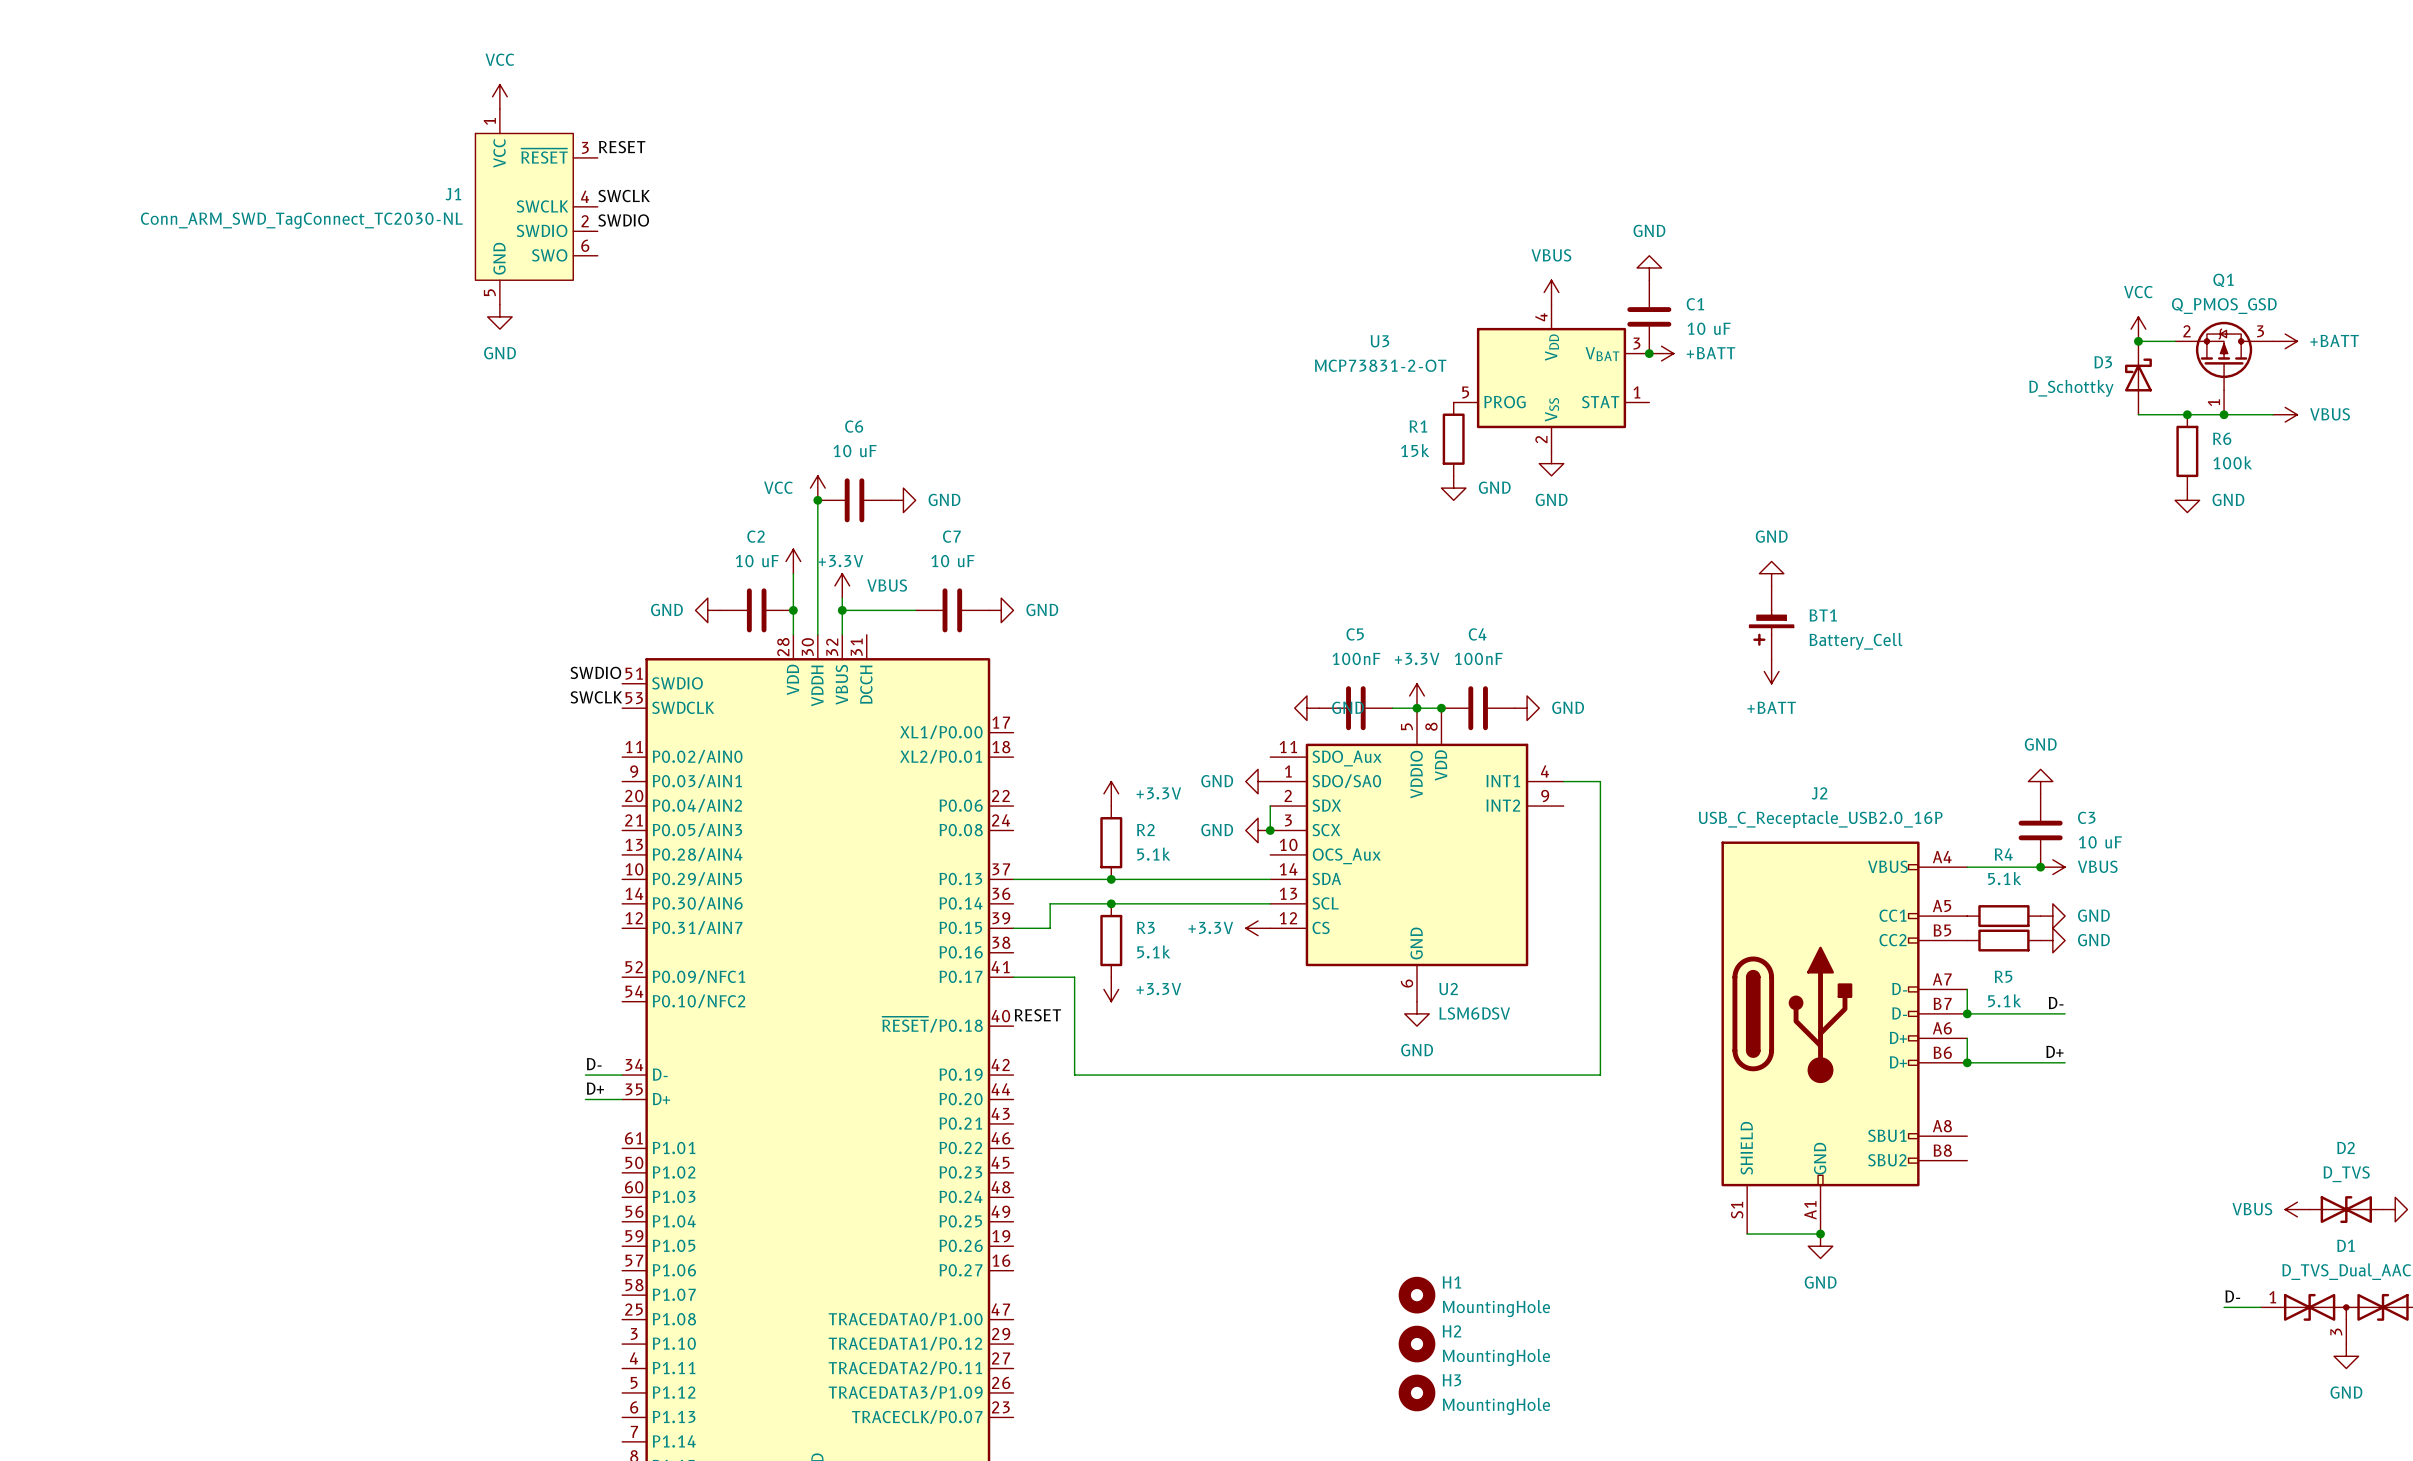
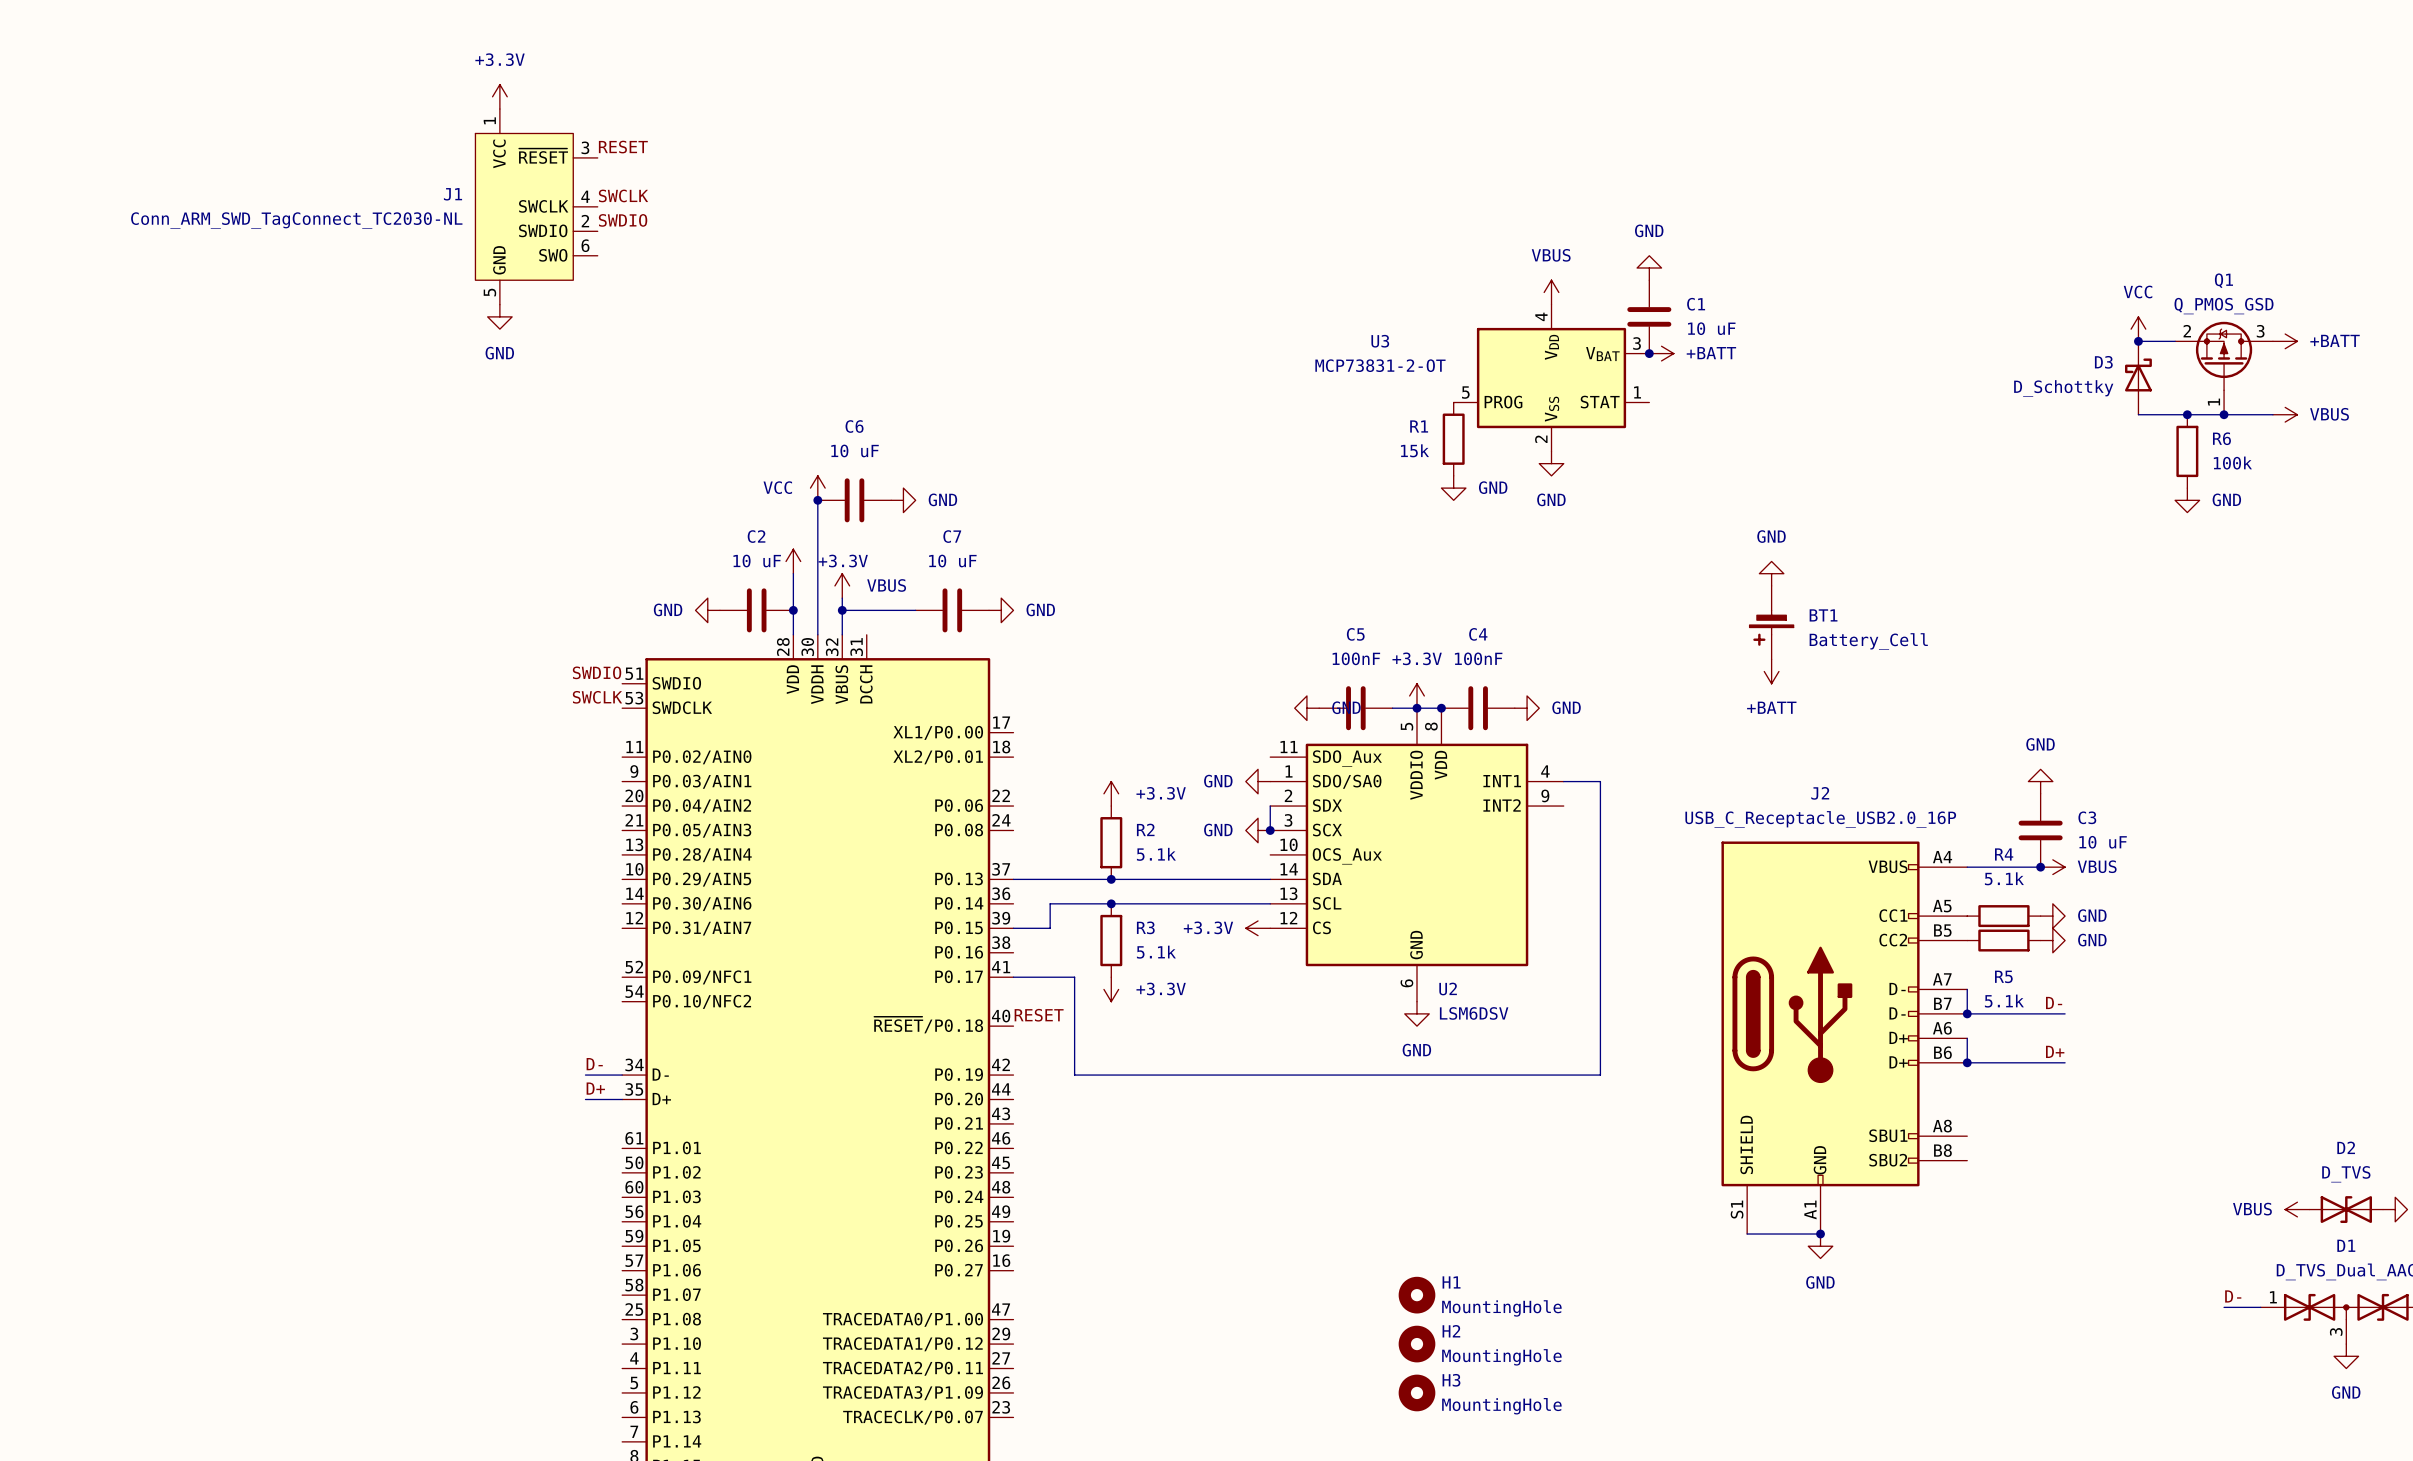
power symbol: VCC (499, 96) -> +3.3V (499, 96)

